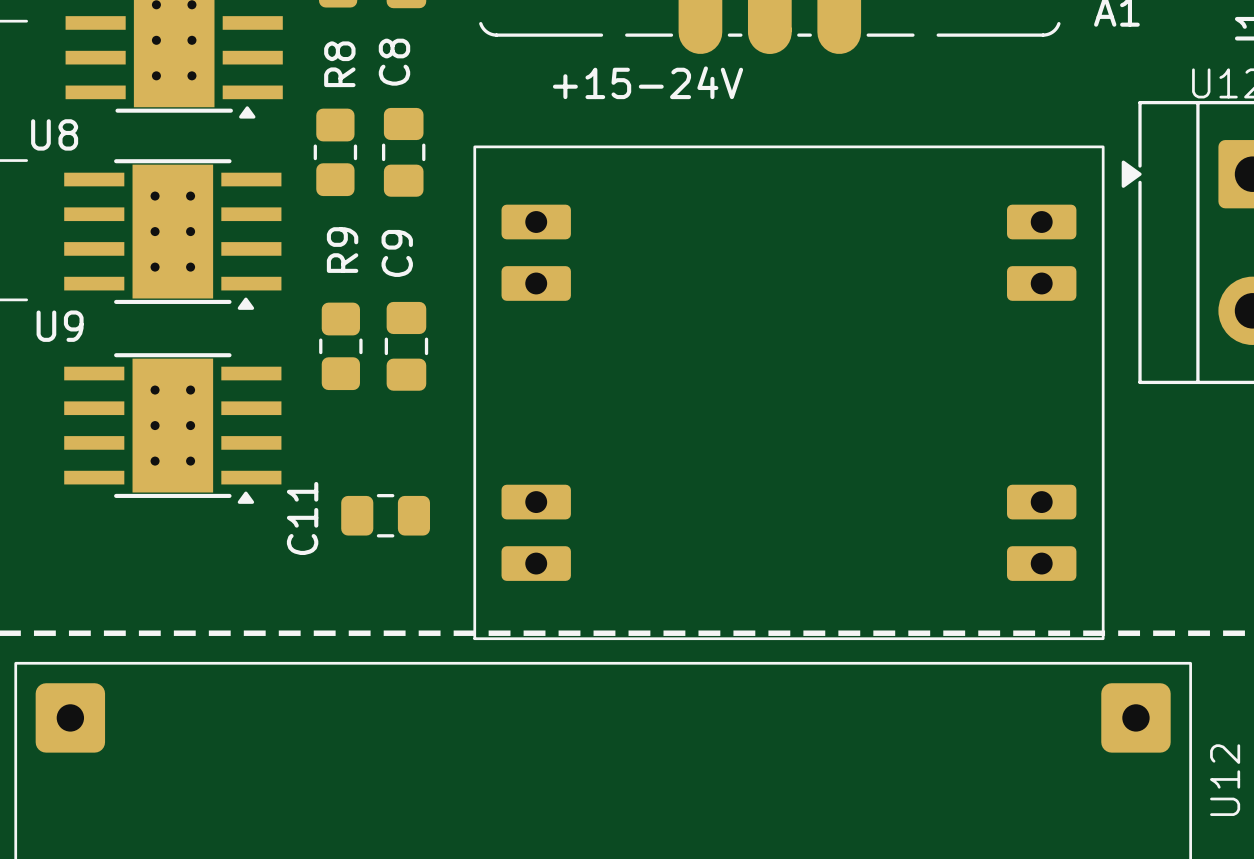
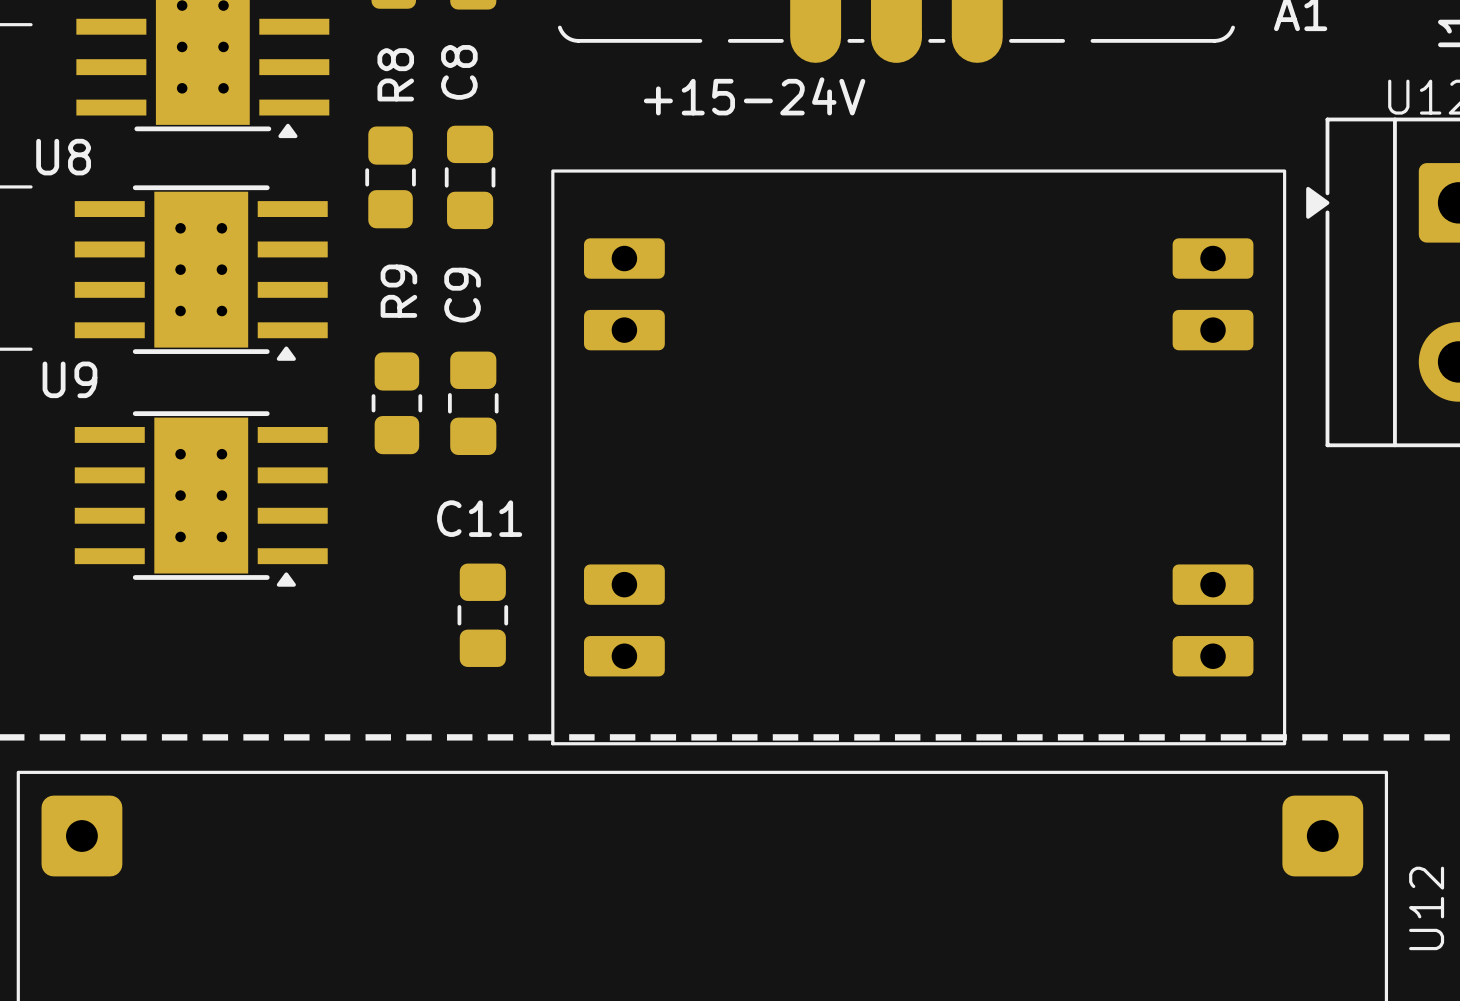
C11 rotation: 0° (385, 515) -> 90° clockwise (482, 615)

